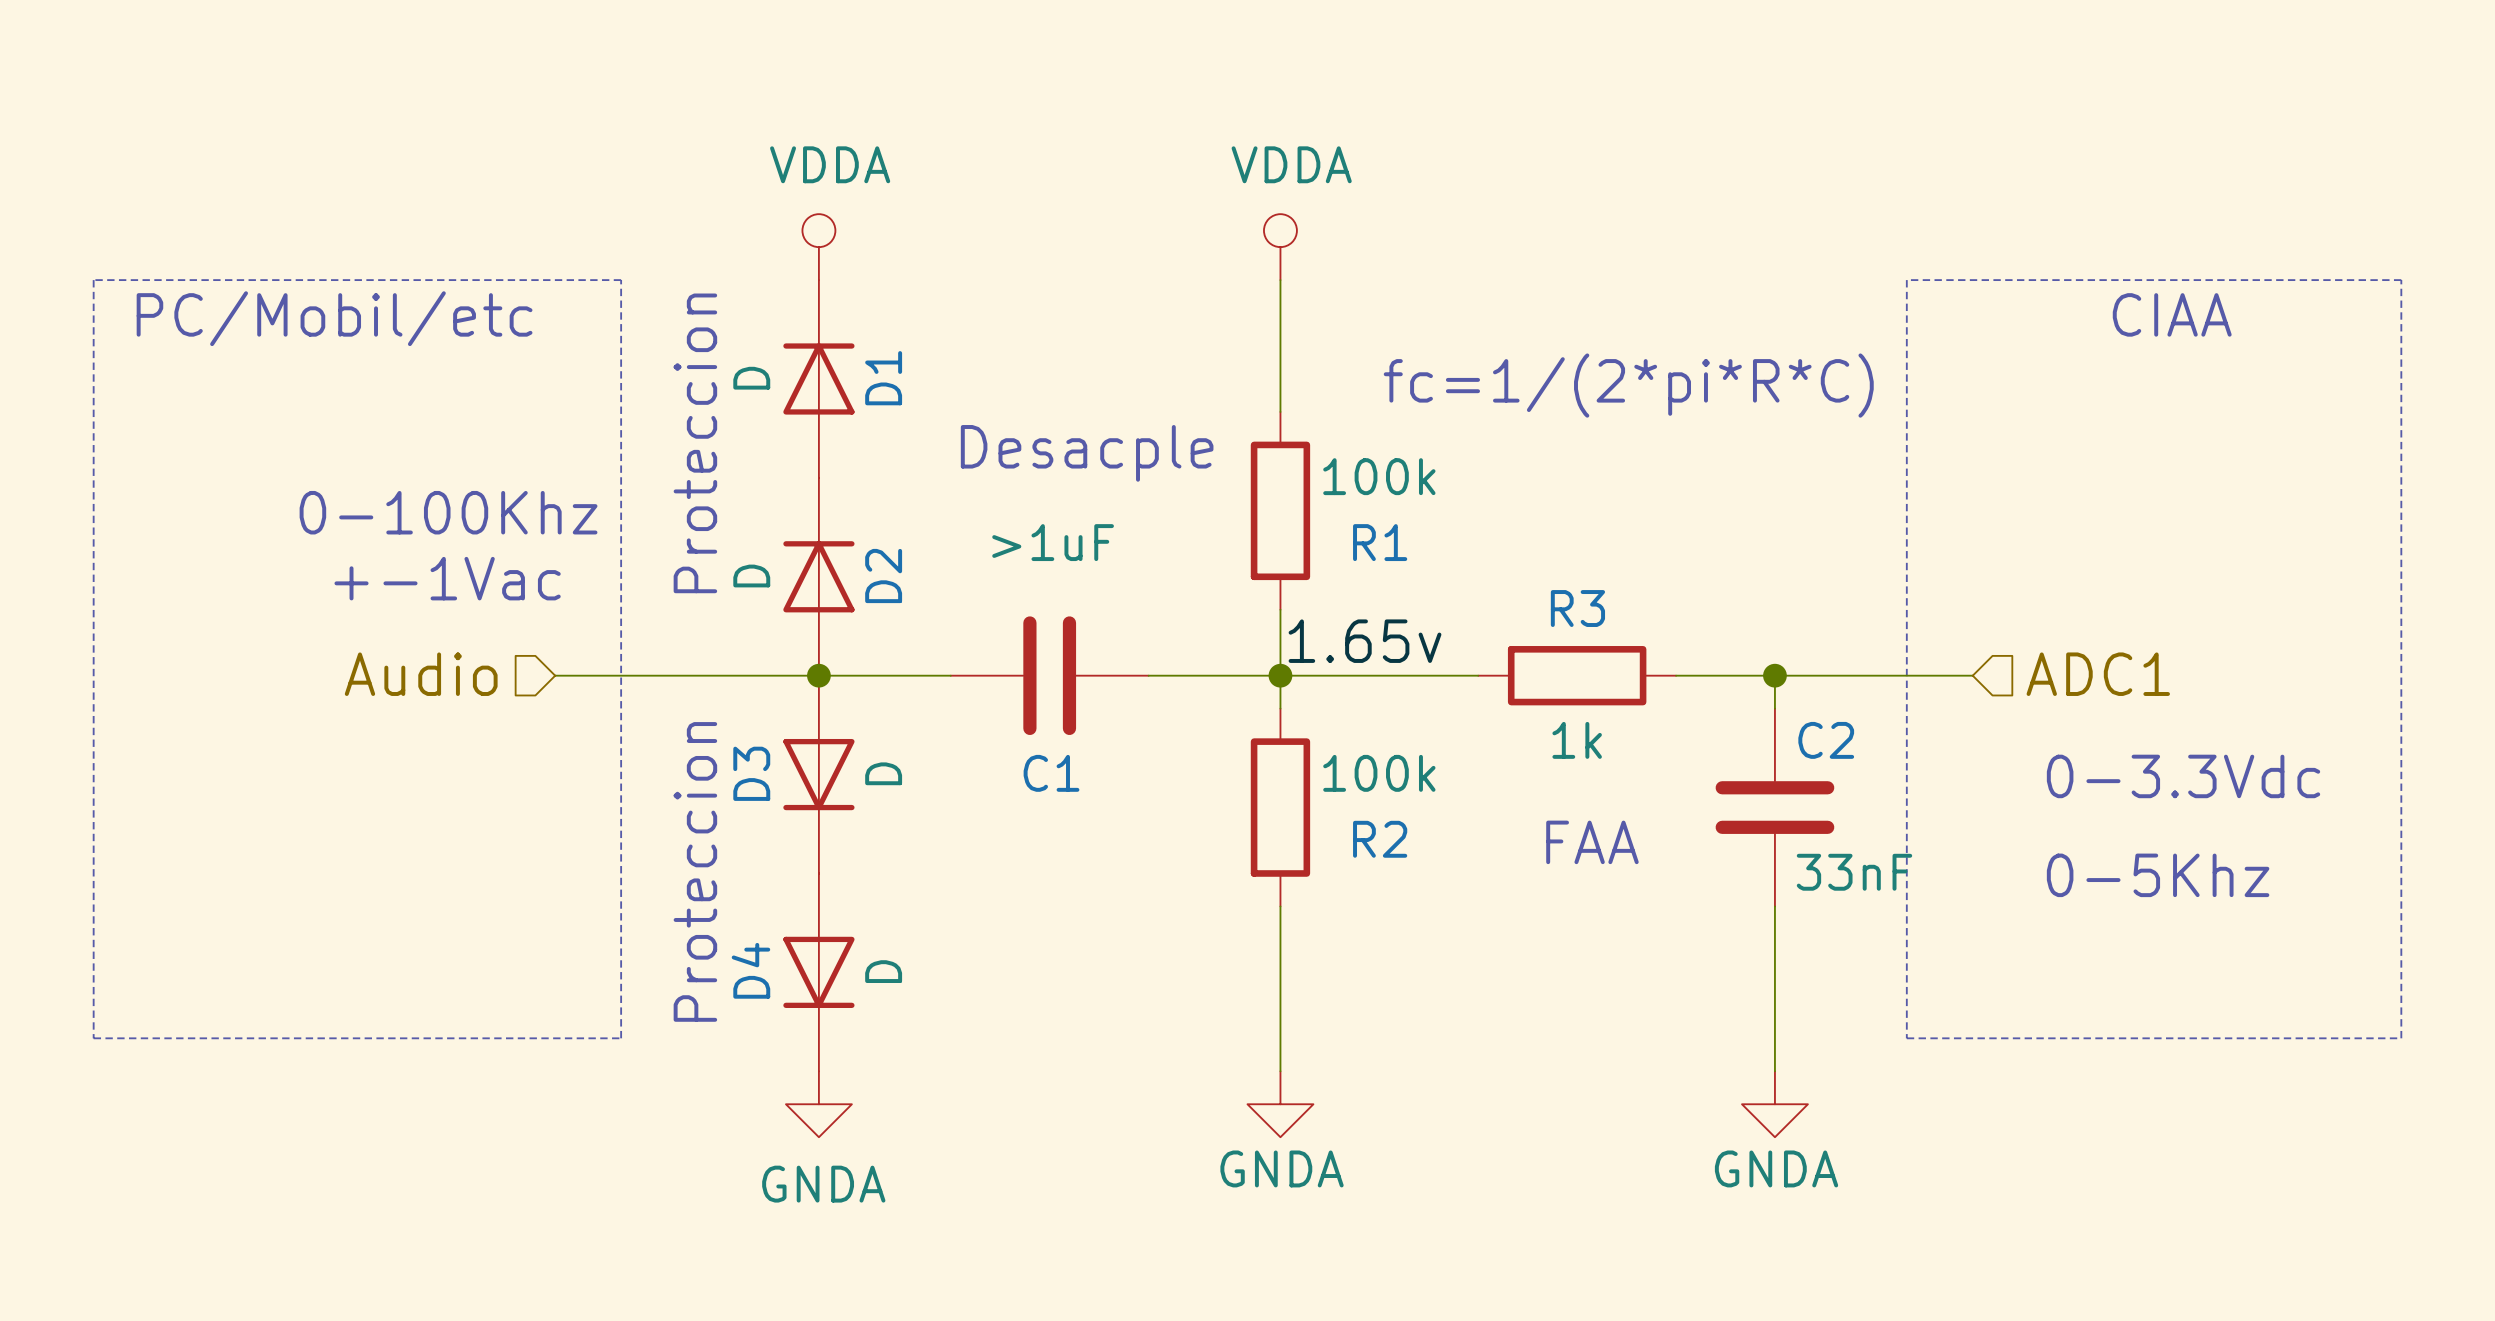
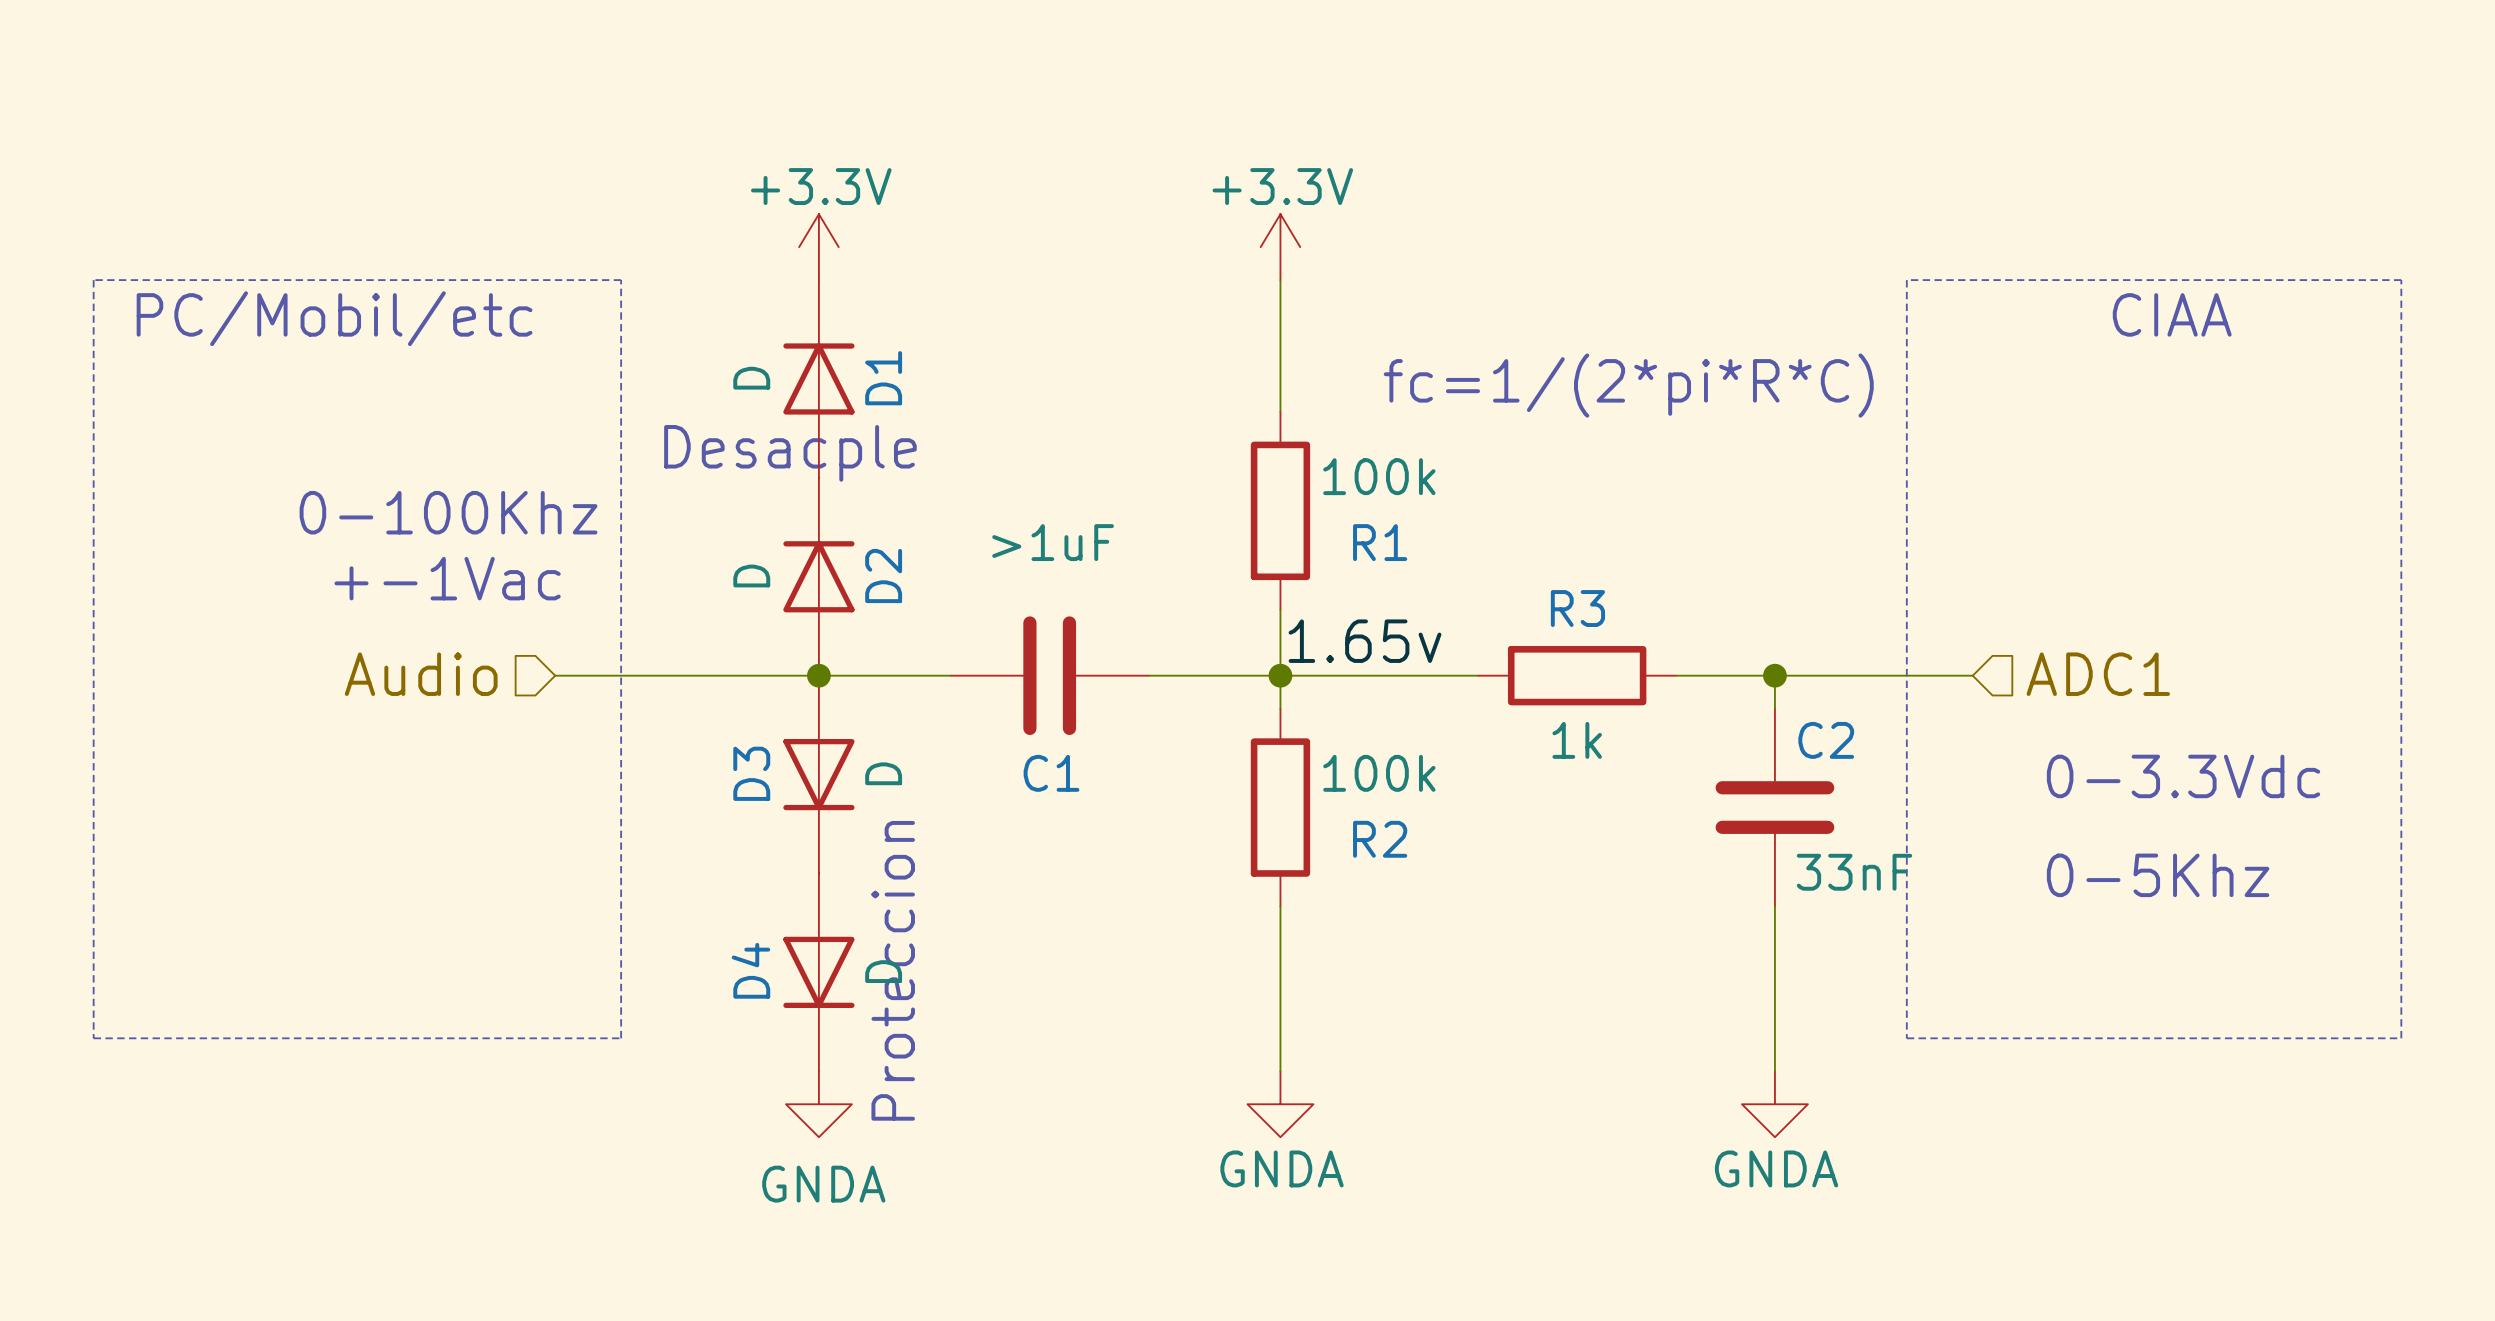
power symbol: VDDA (818, 247) -> +3.3V (818, 247)
power symbol: VDDA (1280, 247) -> +3.3V (1280, 247)
text: Proteccion (695, 443) -> none
text position: Desacple (1087, 453) -> Desacple (790, 453)
text: FAA (1592, 842) -> none
text position: Proteccion (695, 871) -> Proteccion (893, 970)

